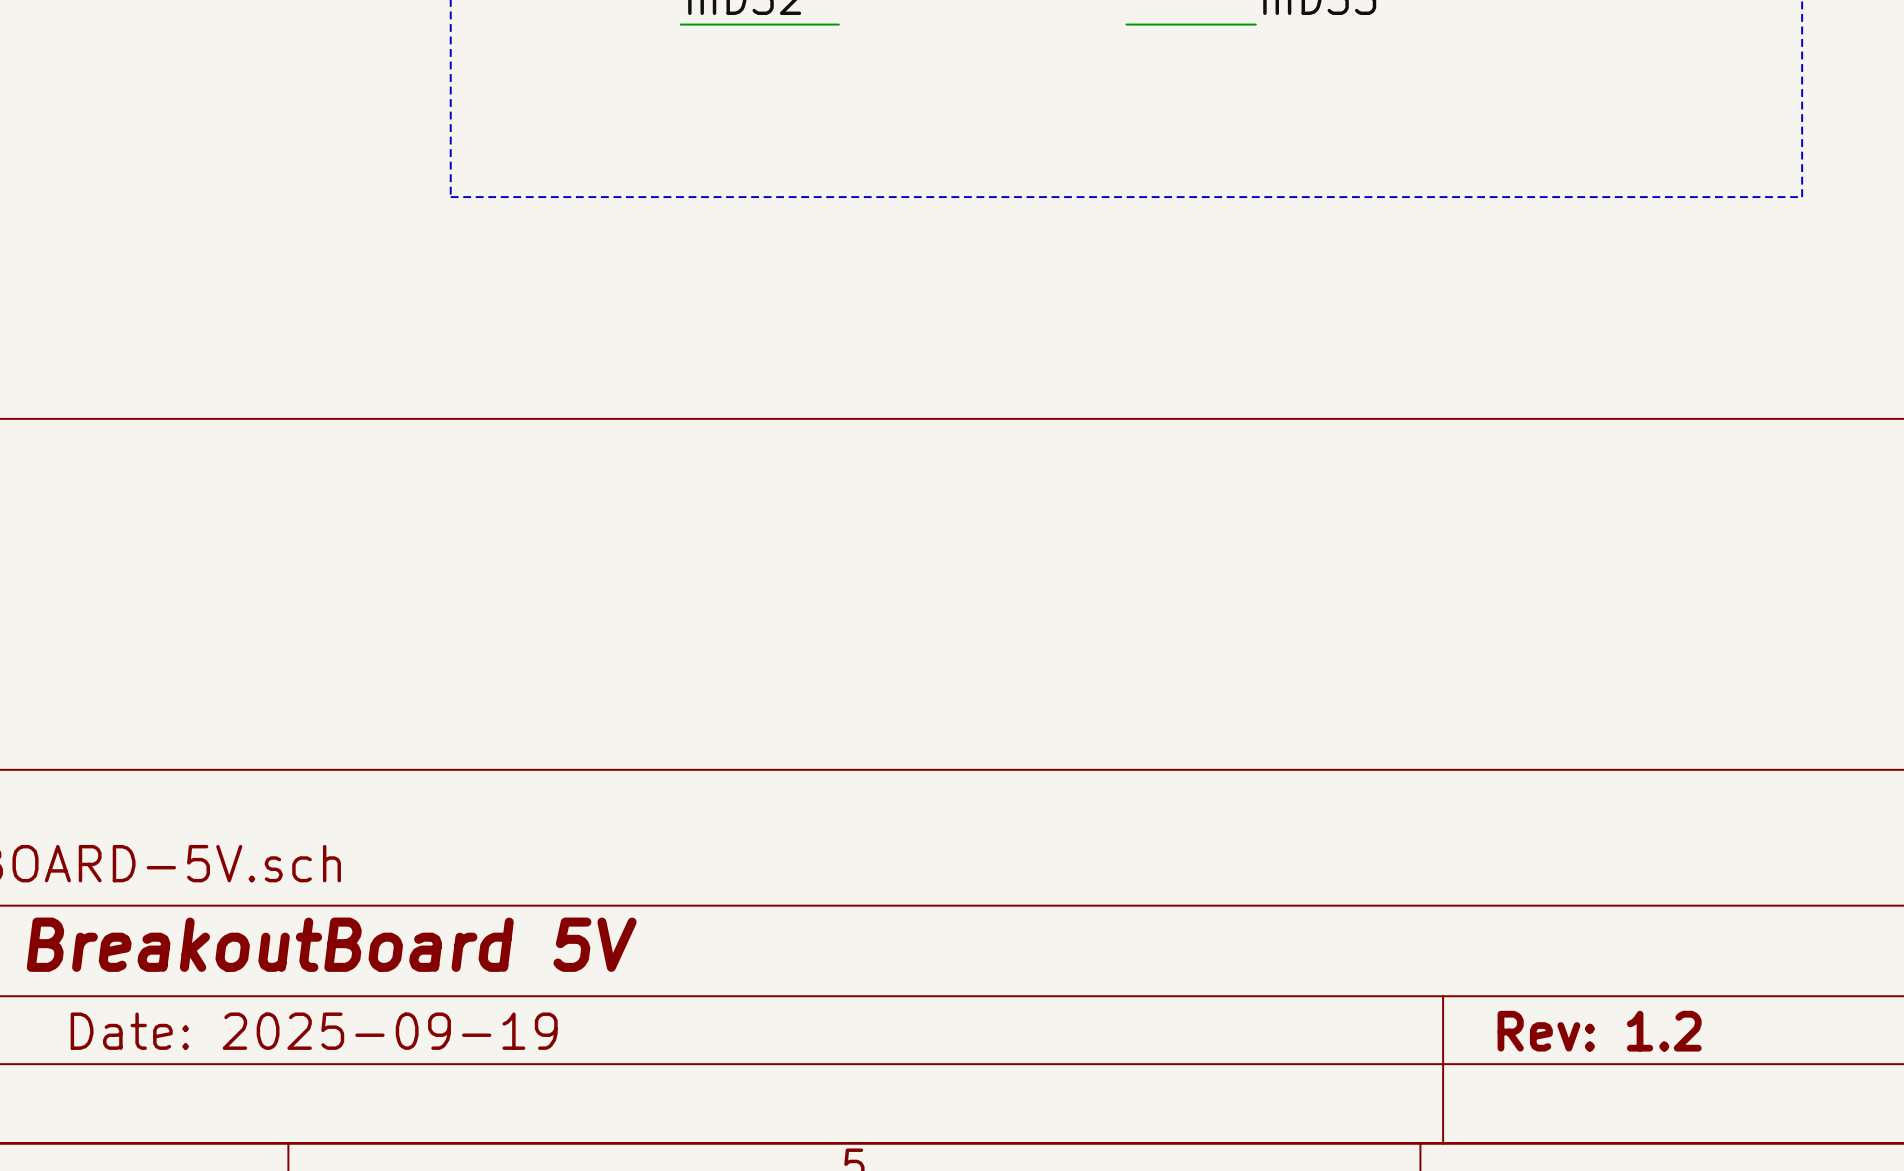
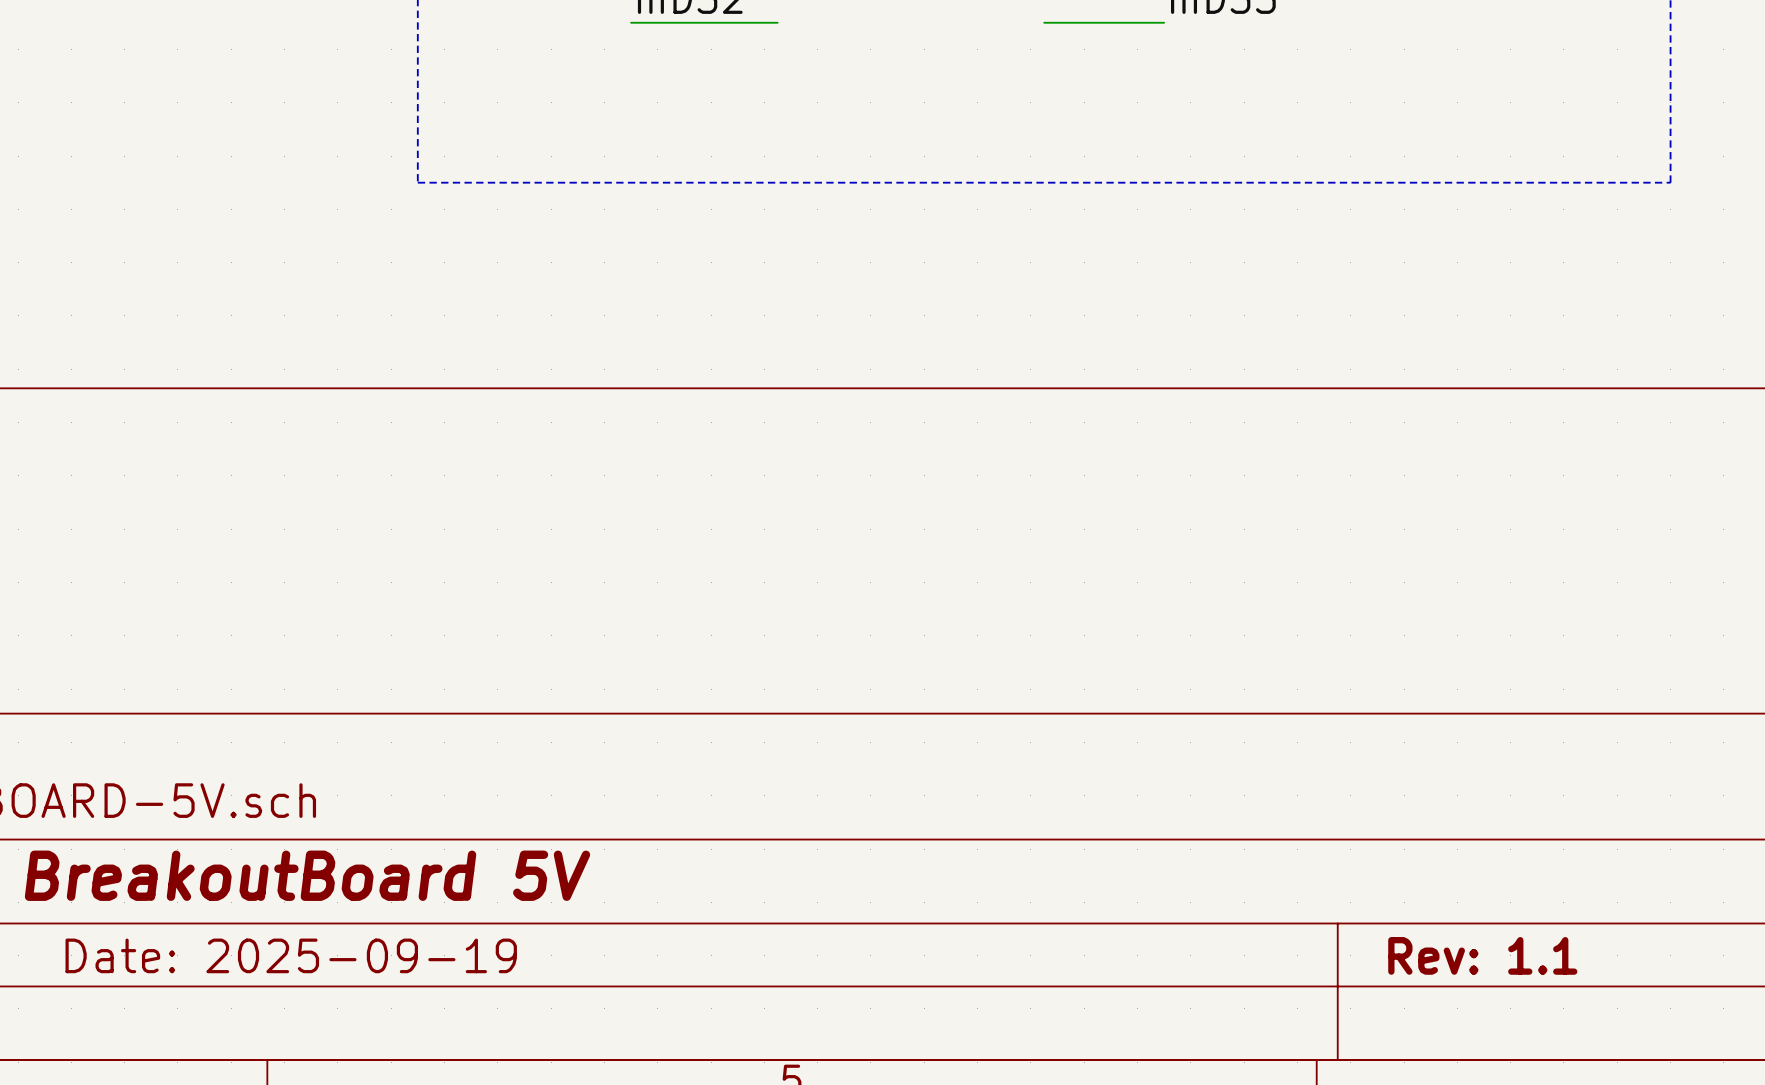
title block: Rev: 1.2 (1599, 1031) -> Rev: 1.1 (1482, 955)

